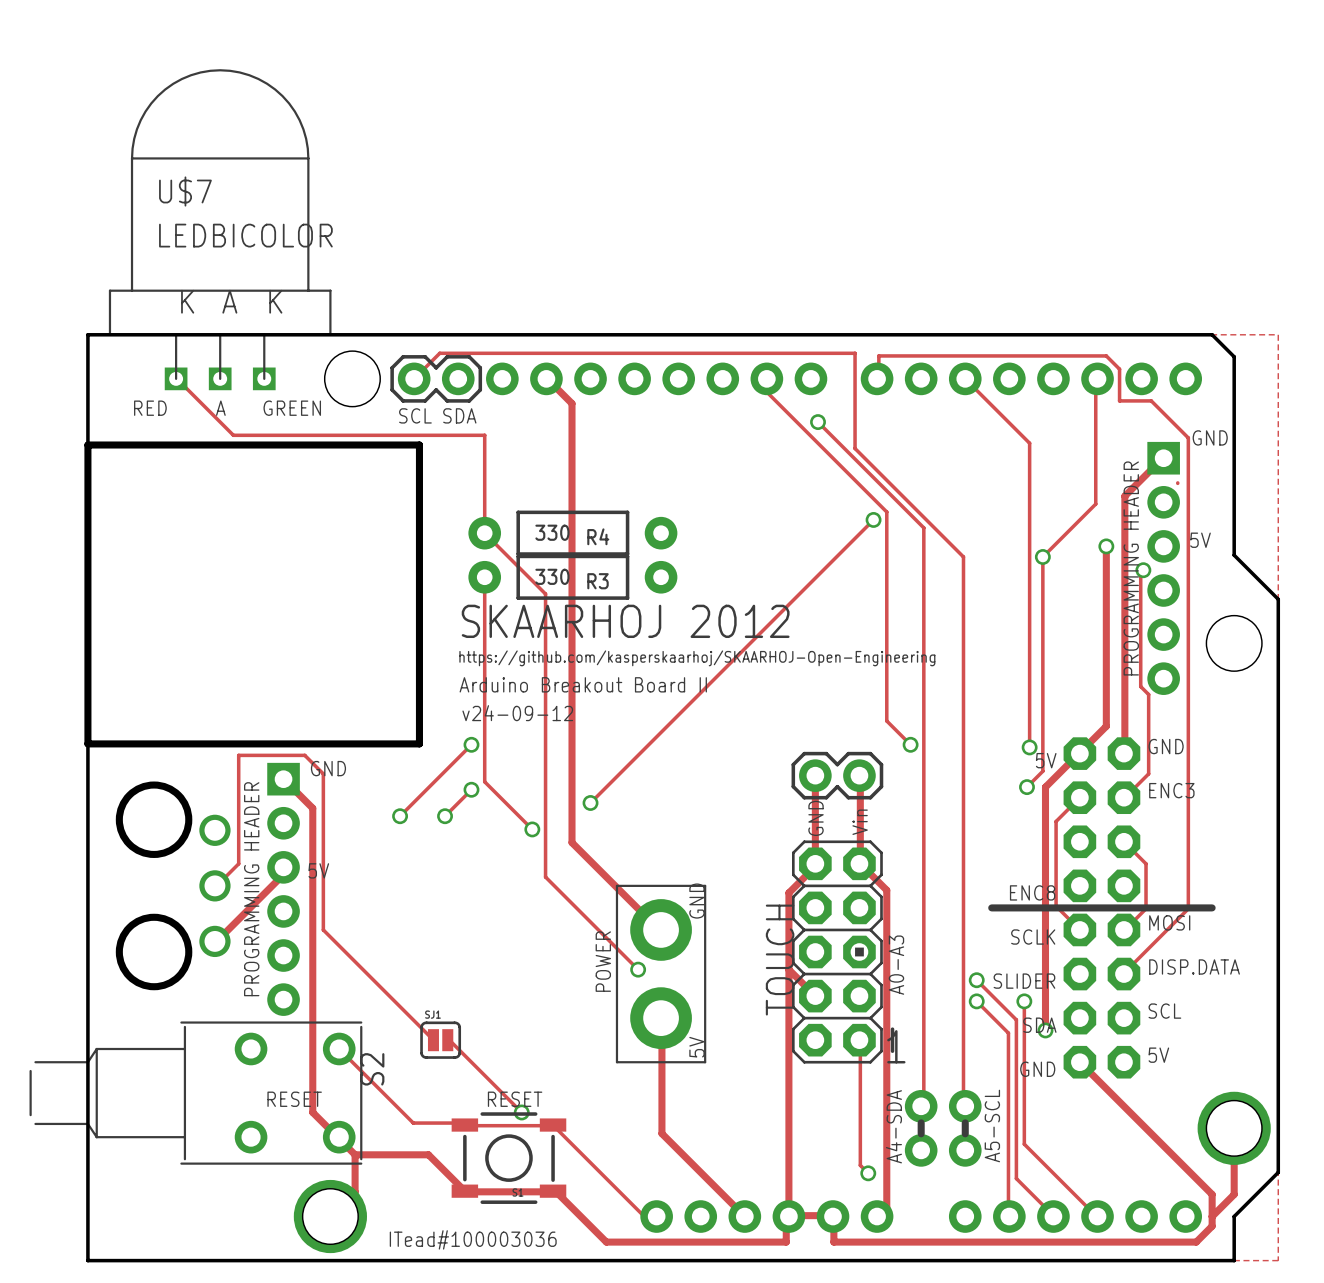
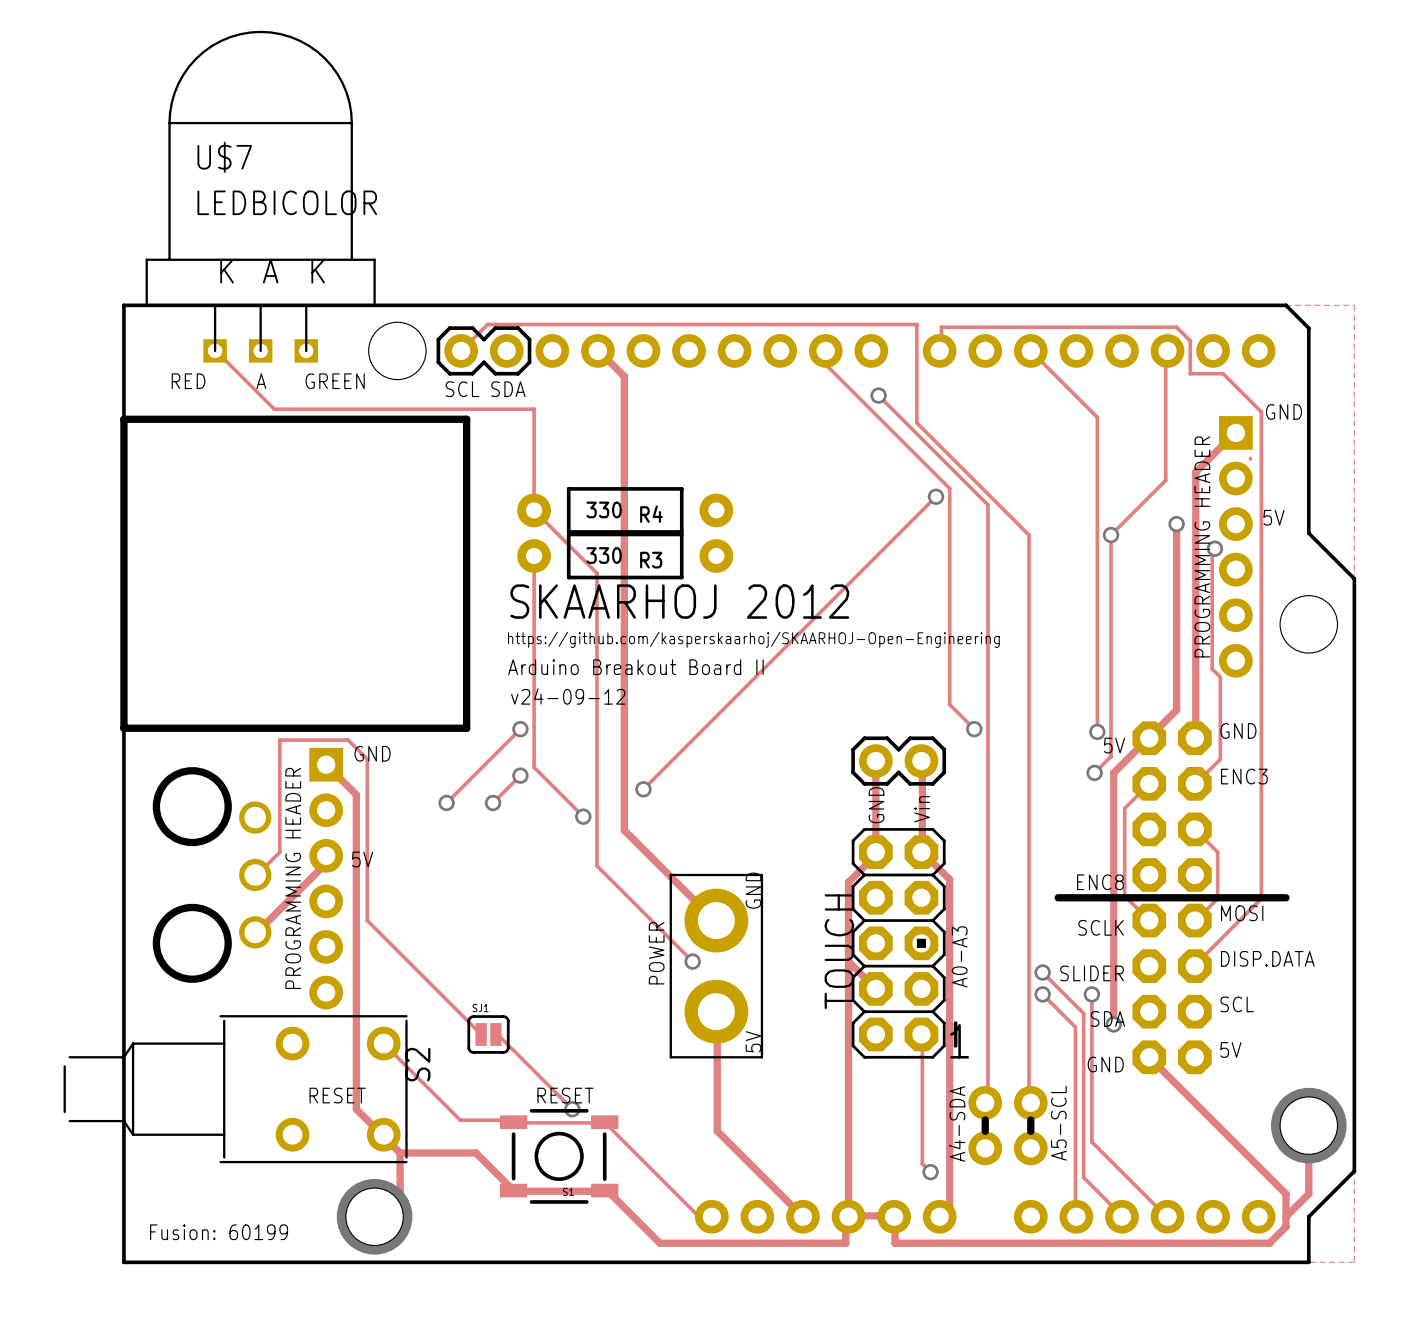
text: none -> Fusion: 60199 (219, 1232)
text: ITead#100003036 (473, 1239) -> none

